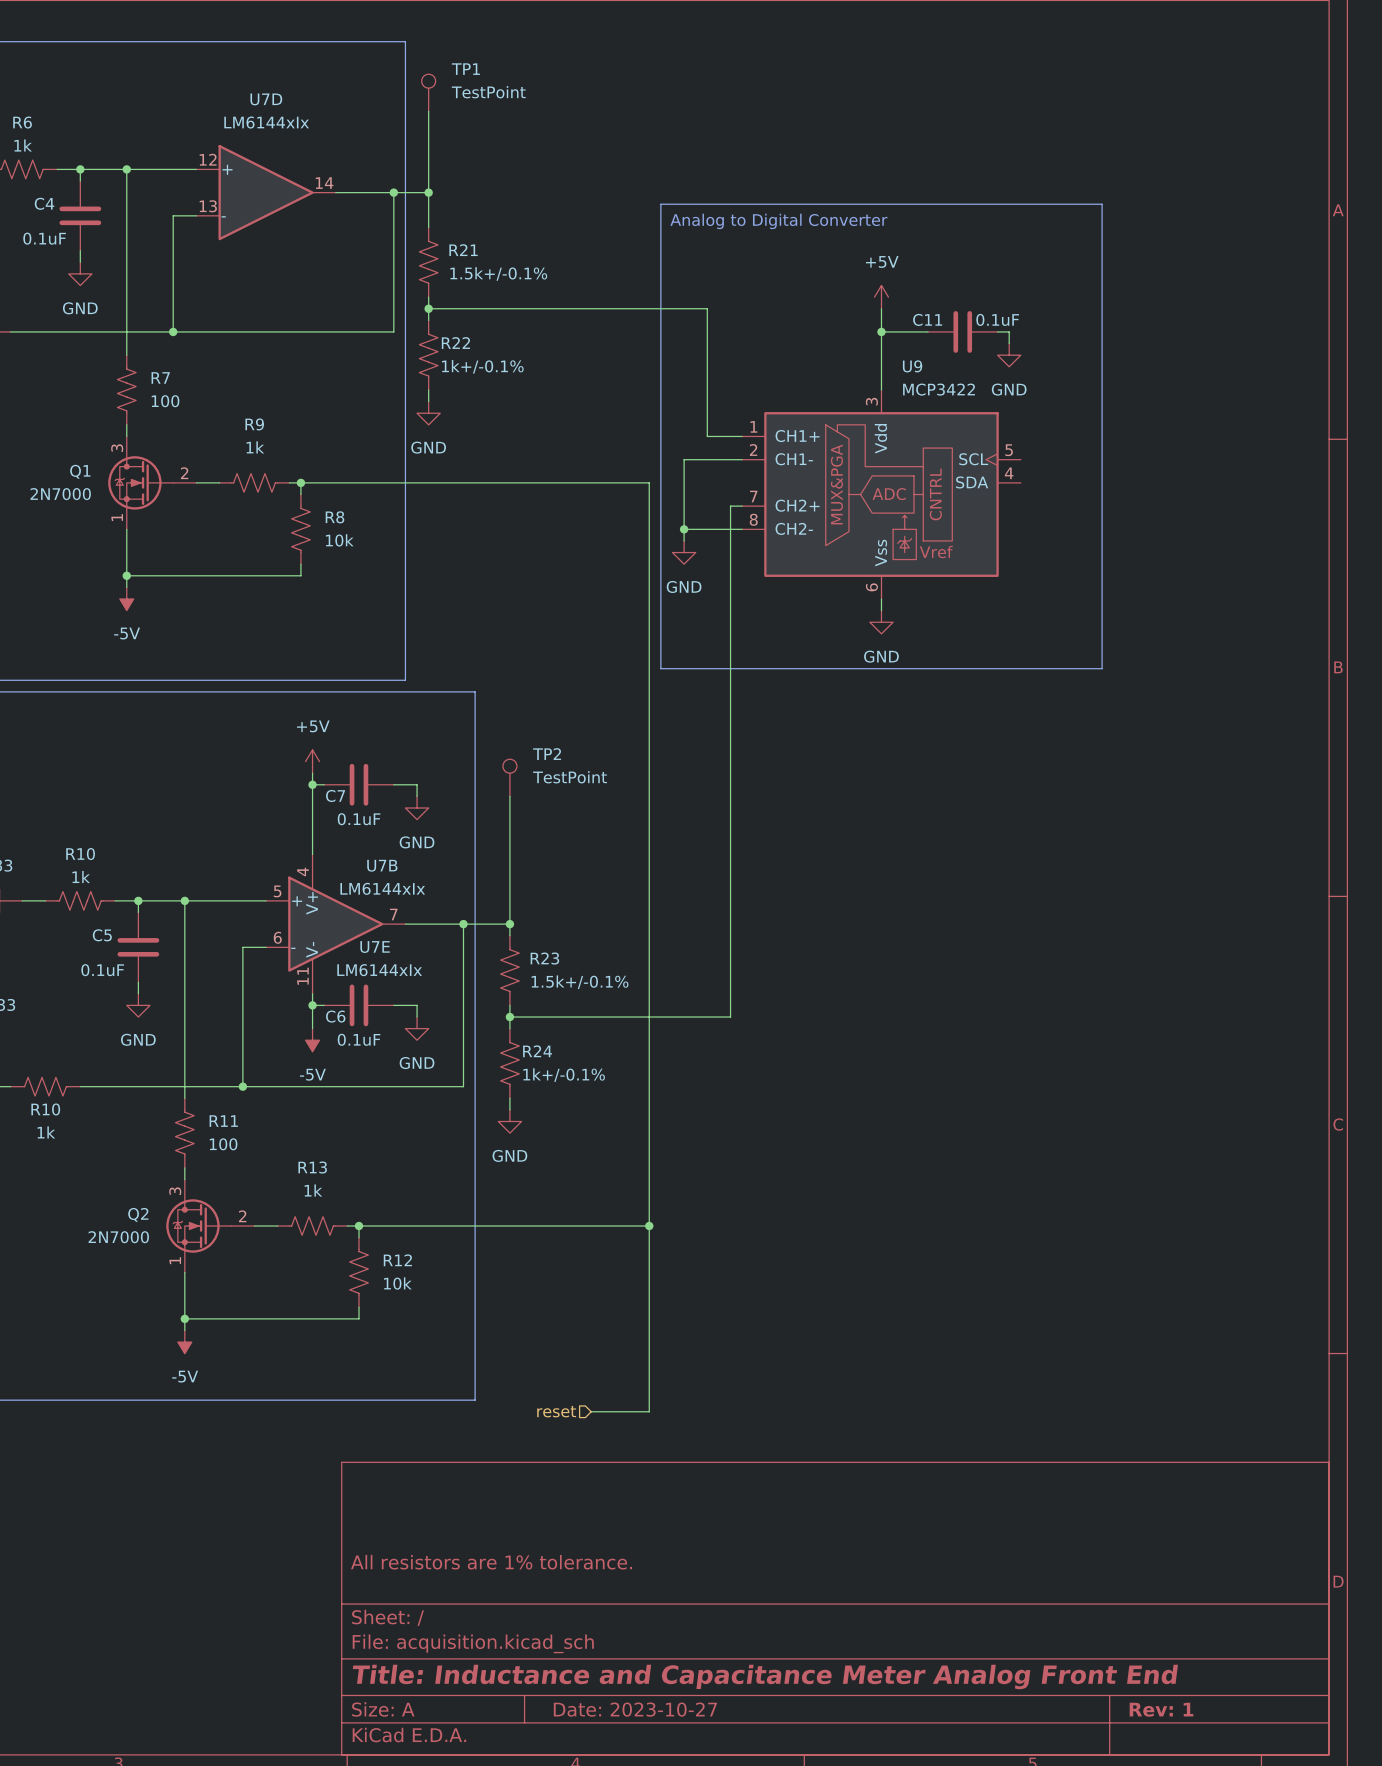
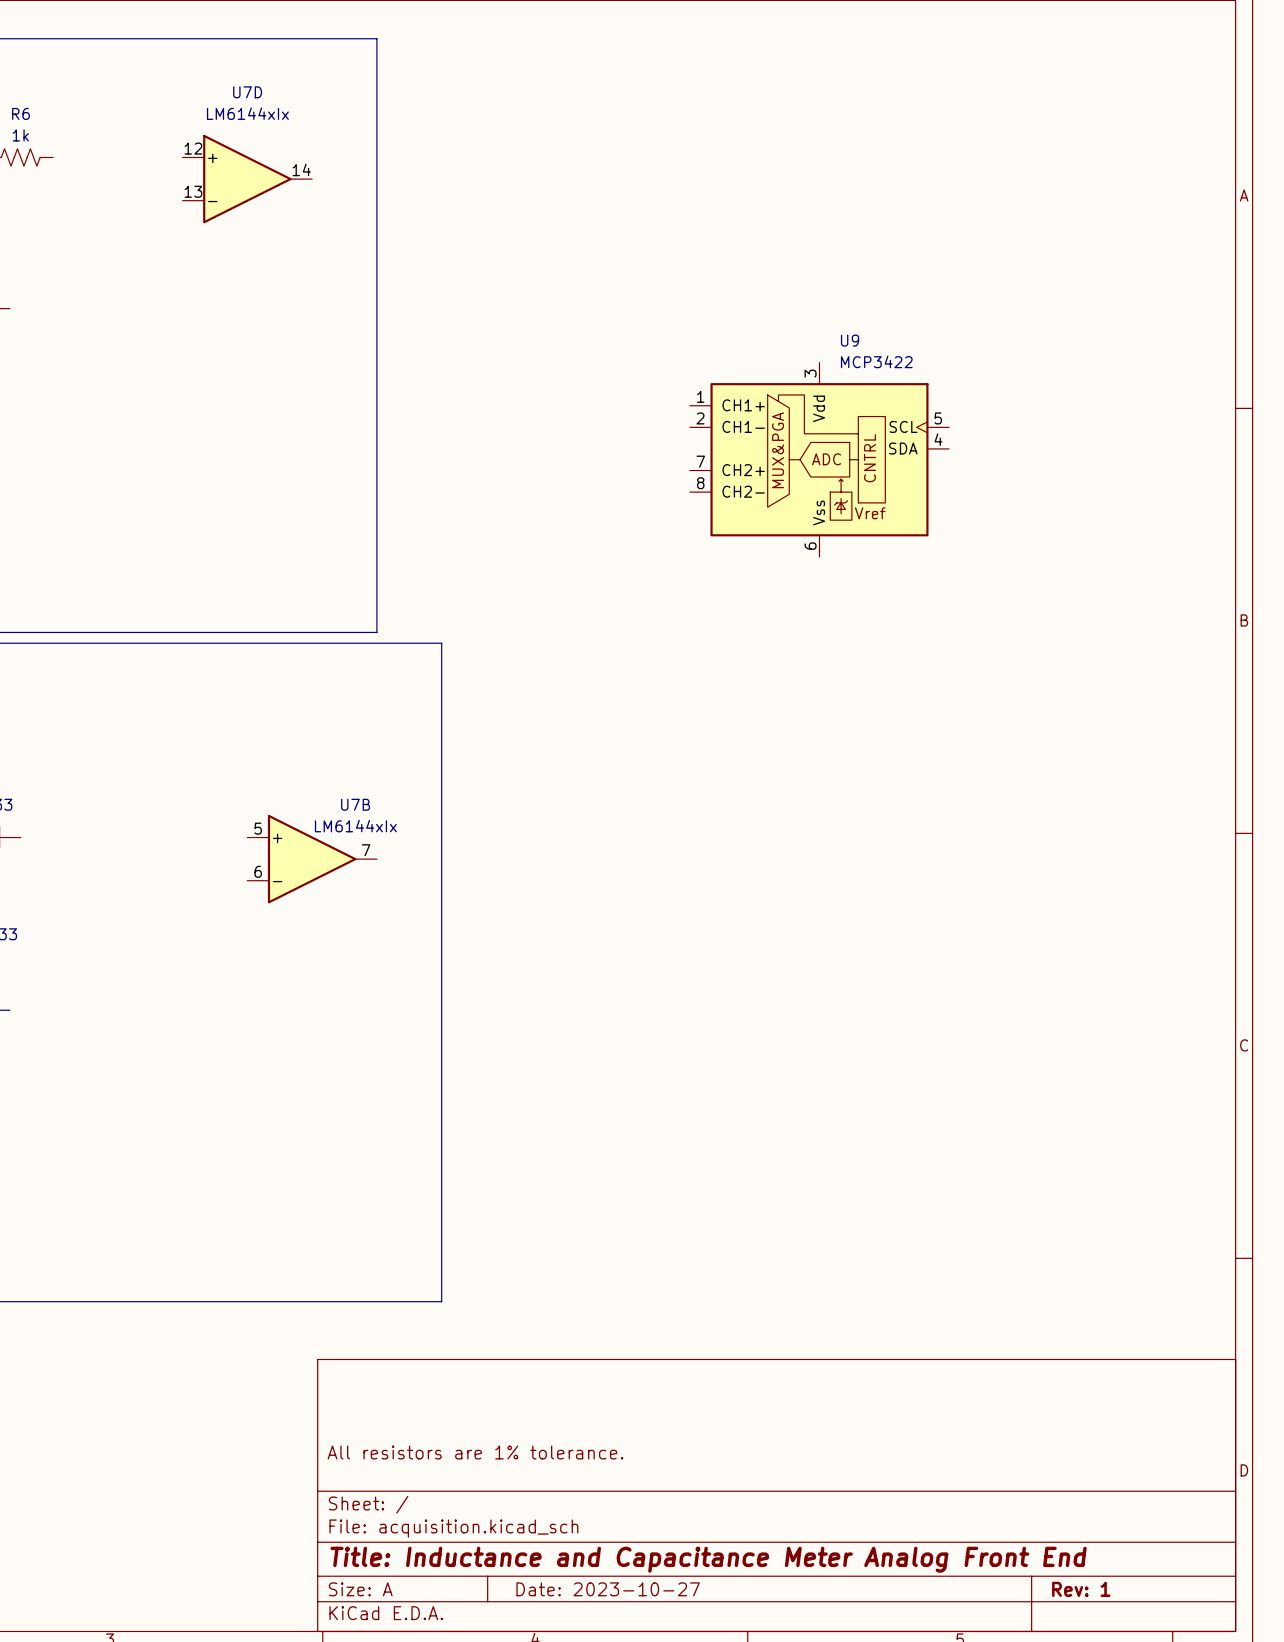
TP1: TestPoint (428, 92) -> none
wire: (428, 111) (428, 227) -> none
wire: (57, 169) (196, 169) -> none
wire: (80, 169) (80, 181) -> none
junction: (80, 169) -> none
wire: (126, 169) (126, 355) -> none
junction: (126, 169) -> none
wire: (335, 192) (428, 192) -> none
wire: (393, 192) (393, 331) (10, 331) -> none
junction: (393, 192) -> none
junction: (428, 192) -> none
line: (660, 204) (1102, 204) (1102, 668) (660, 668) (660, 204) -> none
C4: 0.1uF (80, 215) -> none
wire: (196, 215) (173, 215) (173, 331) -> none
text: Analog to Digital Converter (778, 221) -> none
wire: (80, 250) (80, 262) -> none
R21: 1.5k+/-0.1% (428, 262) -> none
power symbol: GND (80, 273) -> none
wire: (428, 297) (428, 320) -> none
power symbol: +5V (881, 297) -> none
wire: (428, 308) (707, 308) (707, 436) (742, 436) -> none
junction: (428, 308) -> none
wire: (881, 308) (881, 390) -> none
junction: (173, 331) -> none
wire: (881, 331) (927, 331) -> none
junction: (881, 331) -> none
C11: 0.1uF (962, 331) -> none
wire: (997, 331) (1009, 331) (1009, 343) -> none
R22: 1k+/-0.1% (428, 355) -> none
power symbol: GND (1009, 355) -> none
R7: 100 (126, 390) -> none
wire: (428, 390) (428, 401) -> none
power symbol: GND (428, 413) -> none
wire: (126, 424) (126, 436) -> none
wire: (742, 459) (684, 459) (684, 540) -> none
Q1: 2N7000 (152, 482) -> none
wire: (196, 482) (219, 482) -> none
R9: 1k (254, 482) -> none
wire: (289, 482) (649, 482) (649, 1411) (591, 1411) -> none
wire: (300, 482) (300, 494) -> none
junction: (300, 482) -> none
wire: (742, 506) (730, 506) (730, 1017) (509, 1017) -> none
wire: (126, 529) (126, 587) -> none
R8: 10k (300, 529) -> none
wire: (684, 529) (742, 529) -> none
junction: (684, 529) -> none
power symbol: GND (684, 552) -> none
wire: (300, 564) (300, 575) (126, 575) -> none
junction: (126, 575) -> none
power symbol: -5V (126, 599) -> none
wire: (881, 599) (881, 610) -> none
power symbol: GND (881, 622) -> none
power symbol: +5V (312, 761) -> none
wire: (312, 773) (312, 854) -> none
TP2: TestPoint (509, 777) -> none
wire: (312, 784) (324, 784) -> none
junction: (312, 784) -> none
C7: 0.1uF (358, 784) -> none
wire: (393, 784) (417, 784) (417, 796) -> none
wire: (509, 796) (509, 935) -> none
power symbol: GND (417, 808) -> none
wire: (22, 900) (45, 900) -> none
R10: 1k (80, 900) -> none
wire: (115, 900) (266, 900) -> none
wire: (138, 900) (138, 912) -> none
junction: (138, 900) -> none
wire: (184, 900) (184, 1098) -> none
junction: (184, 900) -> none
U7E: LM6144xIx (312, 924) -> none
wire: (405, 924) (509, 924) -> none
wire: (463, 924) (463, 1086) (80, 1086) -> none
junction: (463, 924) -> none
junction: (509, 924) -> none
C5: 0.1uF (138, 947) -> none
wire: (266, 947) (242, 947) (242, 1086) -> none
R23: 1.5k+/-0.1% (509, 970) -> none
wire: (138, 982) (138, 993) -> none
wire: (312, 993) (312, 1028) -> none
power symbol: GND (138, 1005) -> none
wire: (312, 1005) (324, 1005) -> none
junction: (312, 1005) -> none
C6: 0.1uF (358, 1005) -> none
wire: (393, 1005) (417, 1005) (417, 1017) -> none
wire: (509, 1005) (509, 1028) -> none
junction: (509, 1017) -> none
power symbol: GND (417, 1028) -> none
power symbol: -5V (312, 1040) -> none
R24: 1k+/-0.1% (509, 1063) -> none
R10: 1k (45, 1086) -> none
junction: (242, 1086) -> none
wire: (509, 1098) (509, 1109) -> none
power symbol: GND (509, 1121) -> none
R11: 100 (184, 1133) -> none
wire: (184, 1167) (184, 1179) -> none
Q2: 2N7000 (210, 1226) -> none
wire: (254, 1226) (277, 1226) -> none
R13: 1k (312, 1226) -> none
wire: (347, 1226) (649, 1226) -> none
wire: (358, 1226) (358, 1237) -> none
junction: (358, 1226) -> none
junction: (649, 1226) -> none
wire: (184, 1272) (184, 1330) -> none
R12: 10k (358, 1272) -> none
wire: (358, 1307) (358, 1318) (184, 1318) -> none
junction: (184, 1318) -> none
power symbol: -5V (184, 1342) -> none
hierarchical label: reset (556, 1411) -> none

